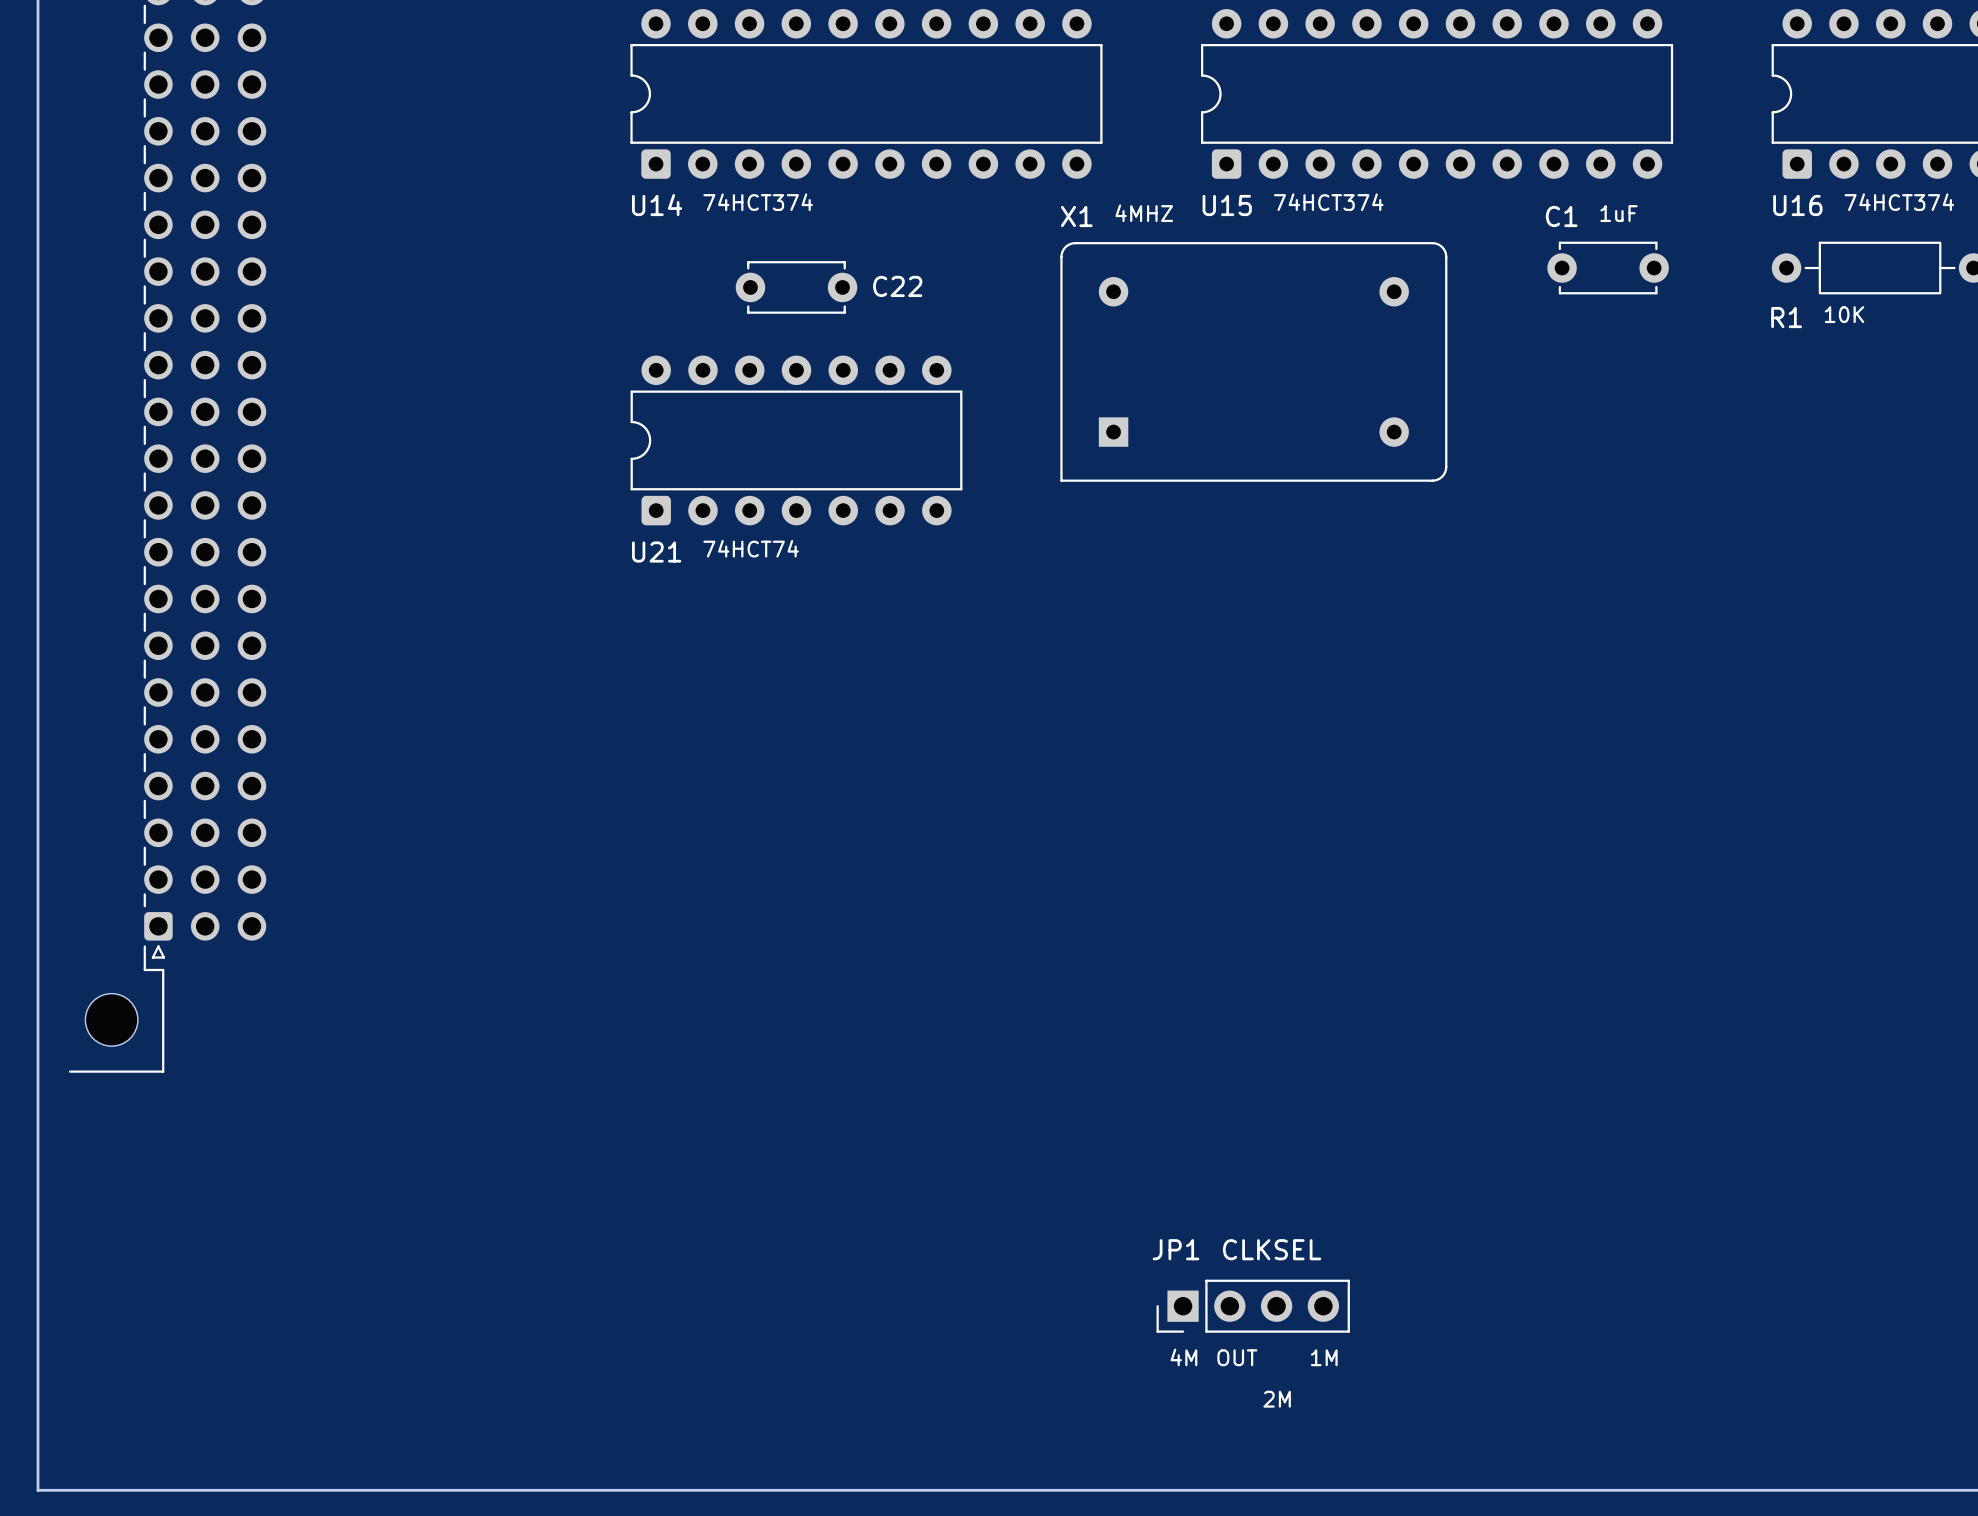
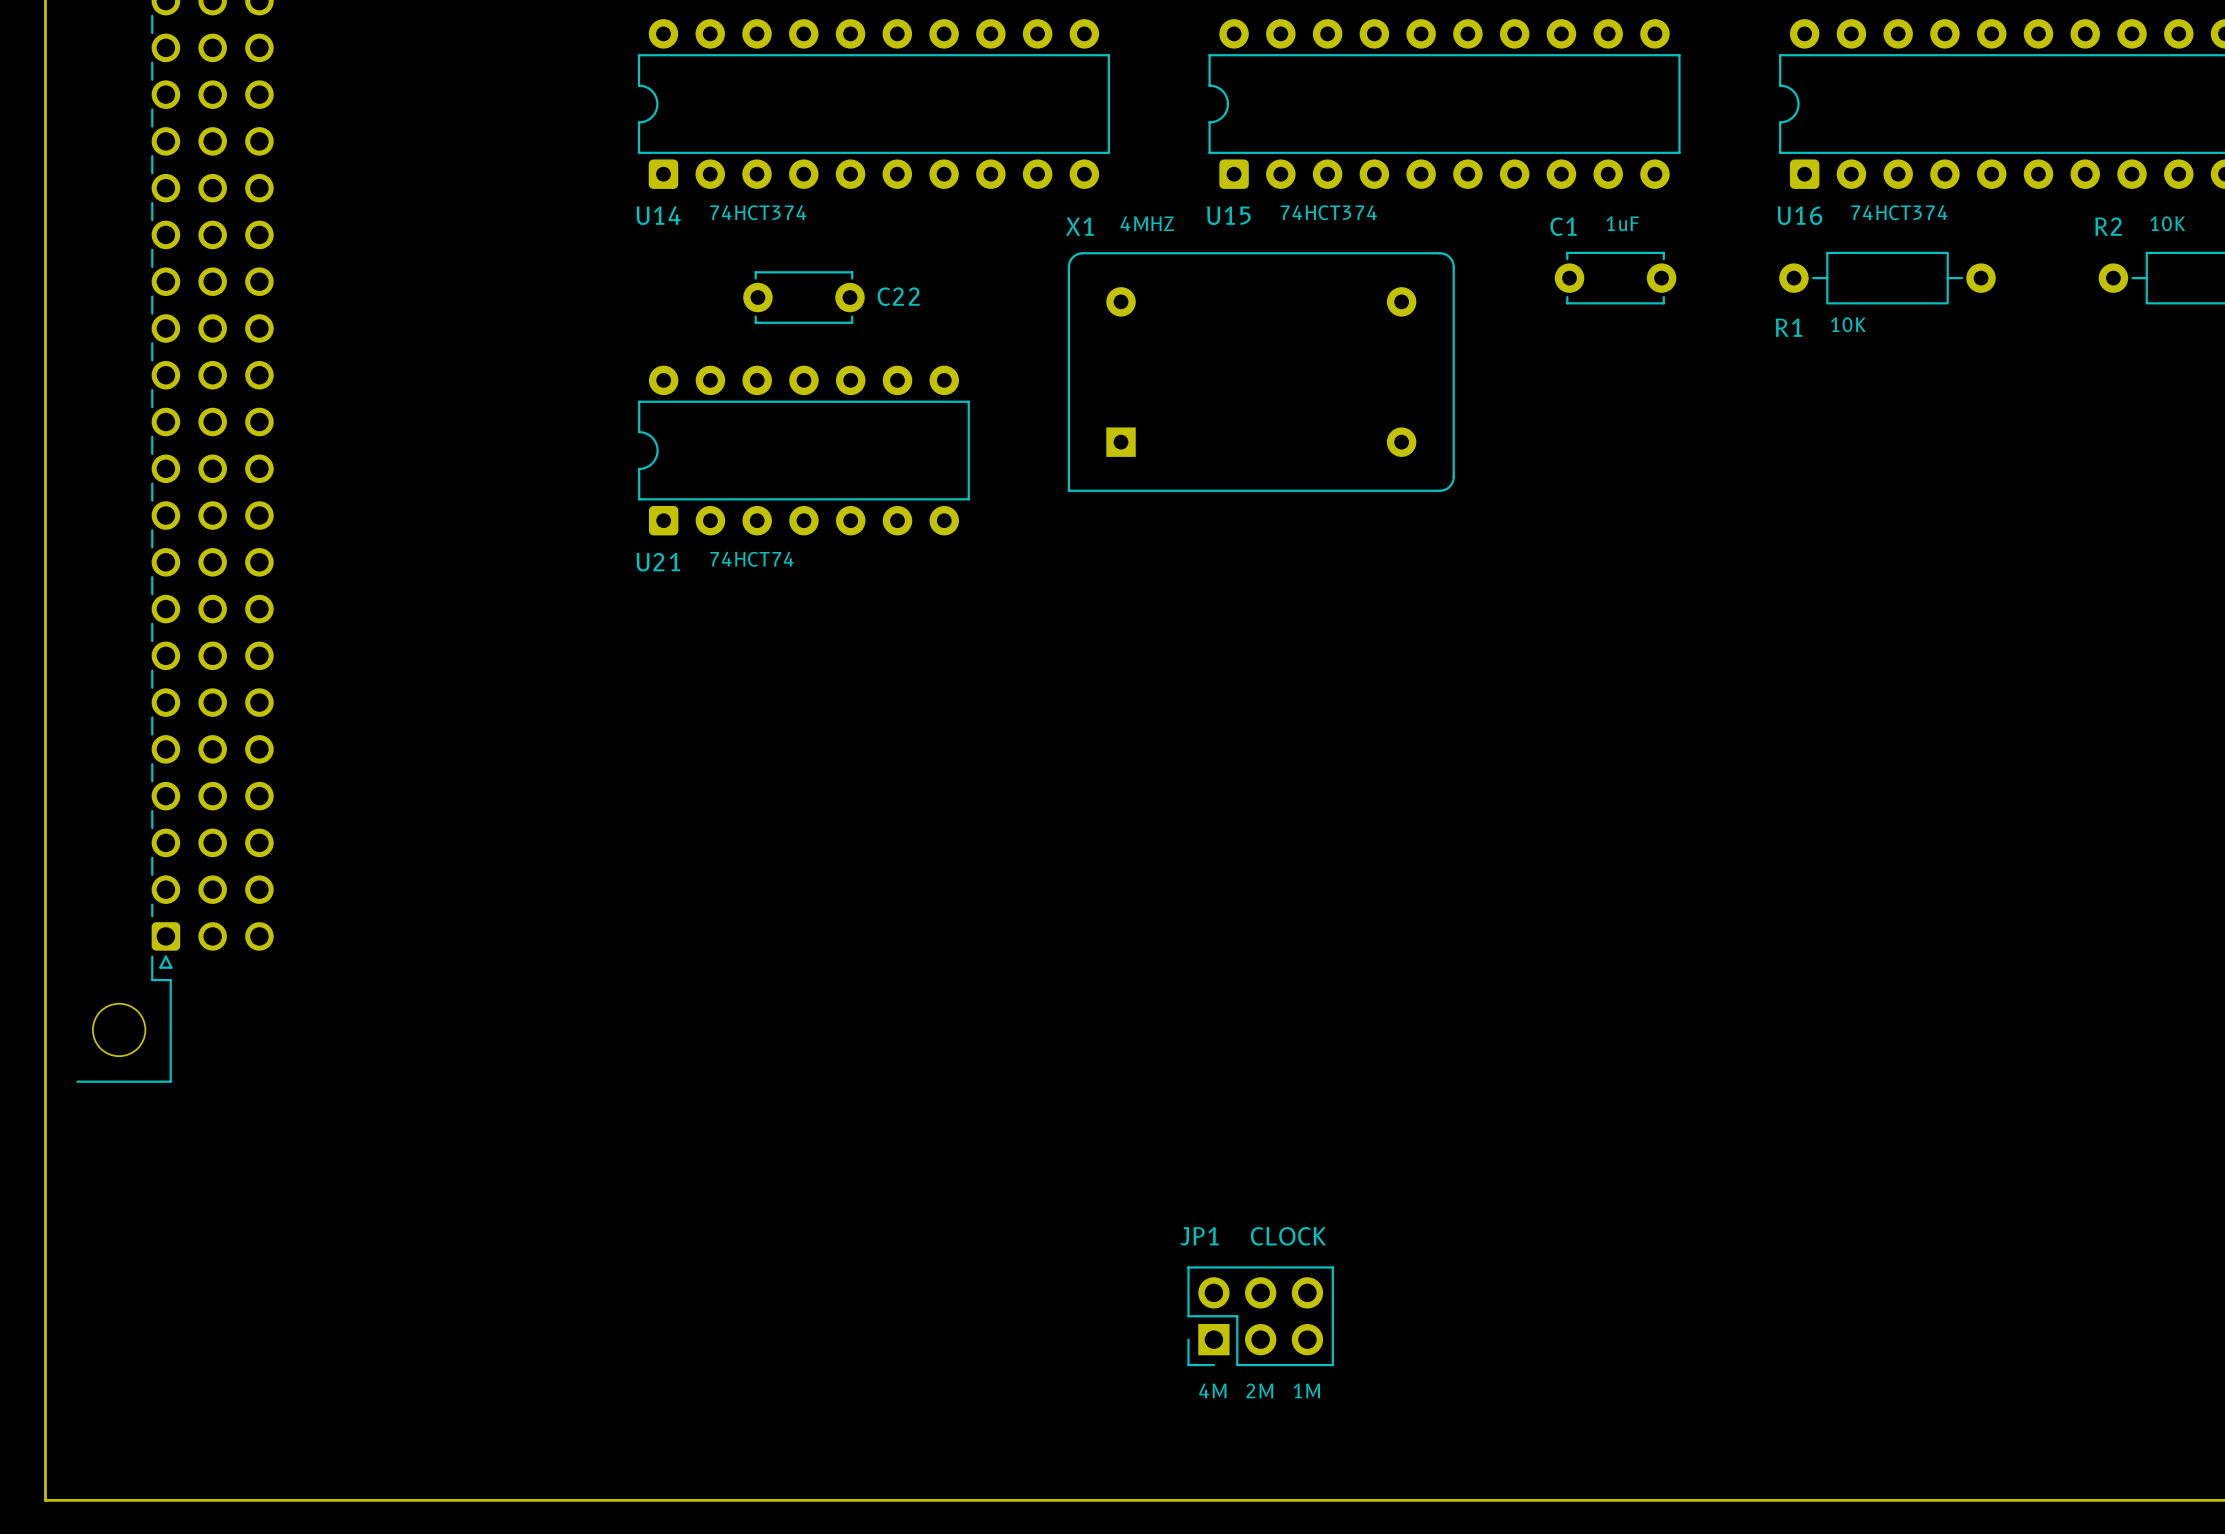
text: none -> CLOCK (1288, 1236)
text: CLKSEL (1272, 1249) -> none
JP1 footprint: [1156, 1279, 1350, 1333] -> [1187, 1266, 1334, 1367]
text position: 4M (1183, 1357) -> 4M (1212, 1390)
text: OUT (1237, 1357) -> none
text position: 1M (1324, 1357) -> 1M (1306, 1390)
text position: 2M (1277, 1399) -> 2M (1259, 1390)

